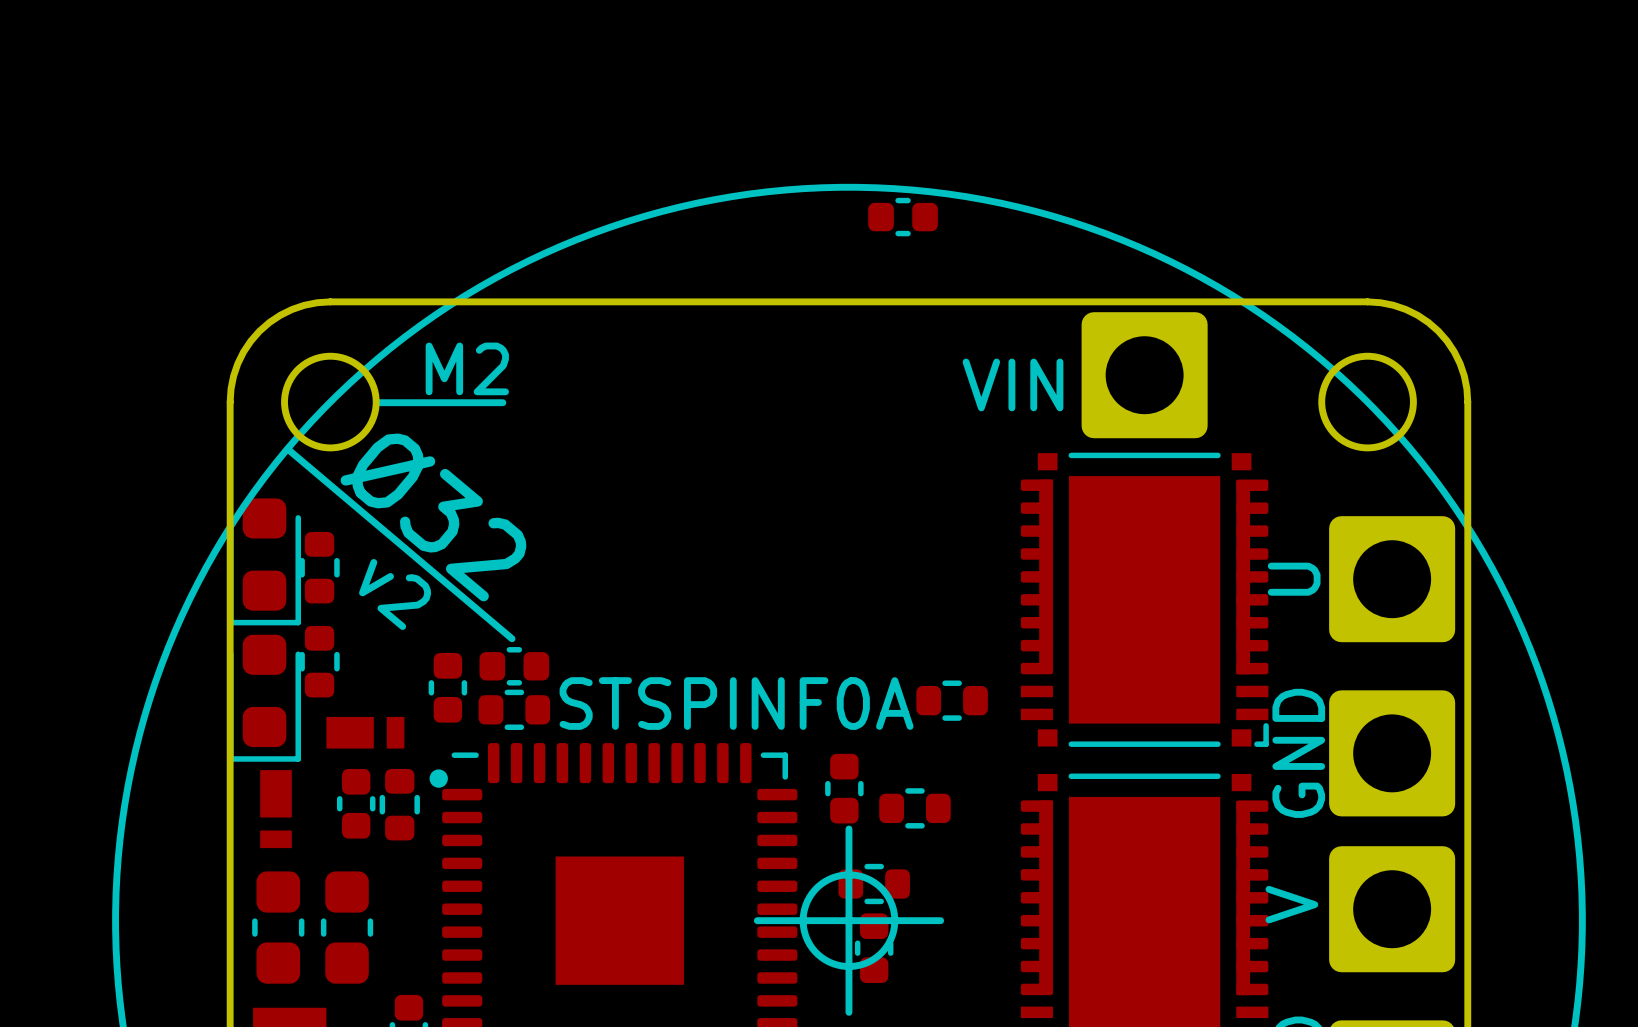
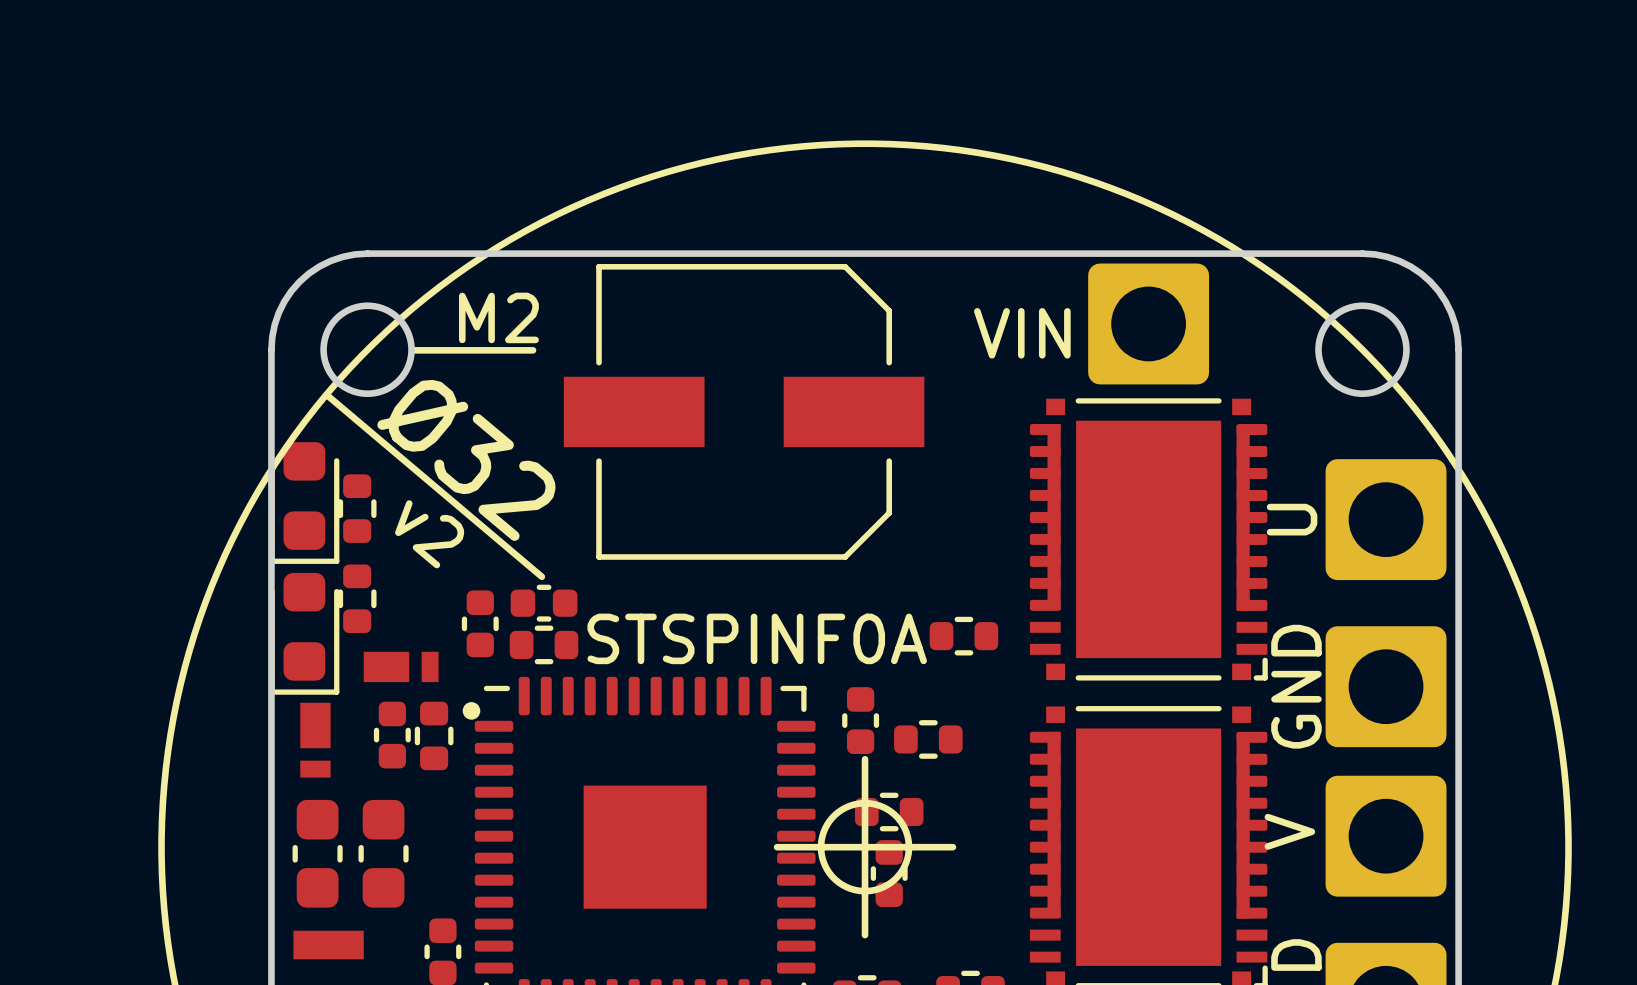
part: (903, 217) -> none
part: none -> (744, 411)

